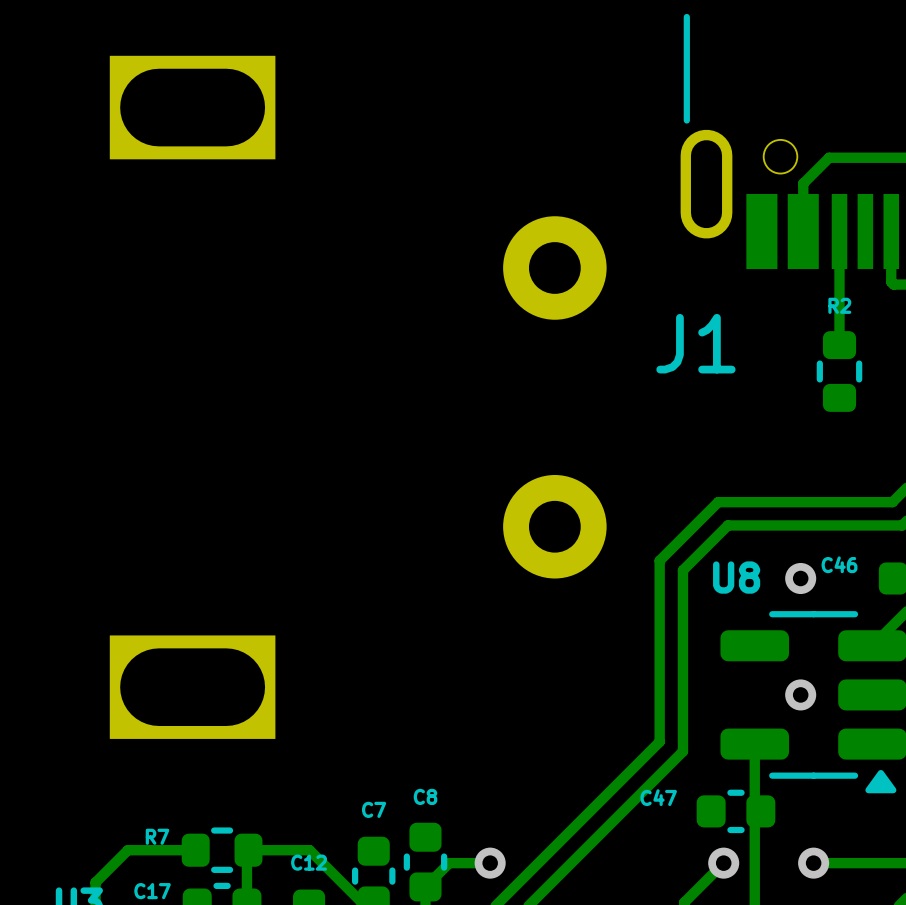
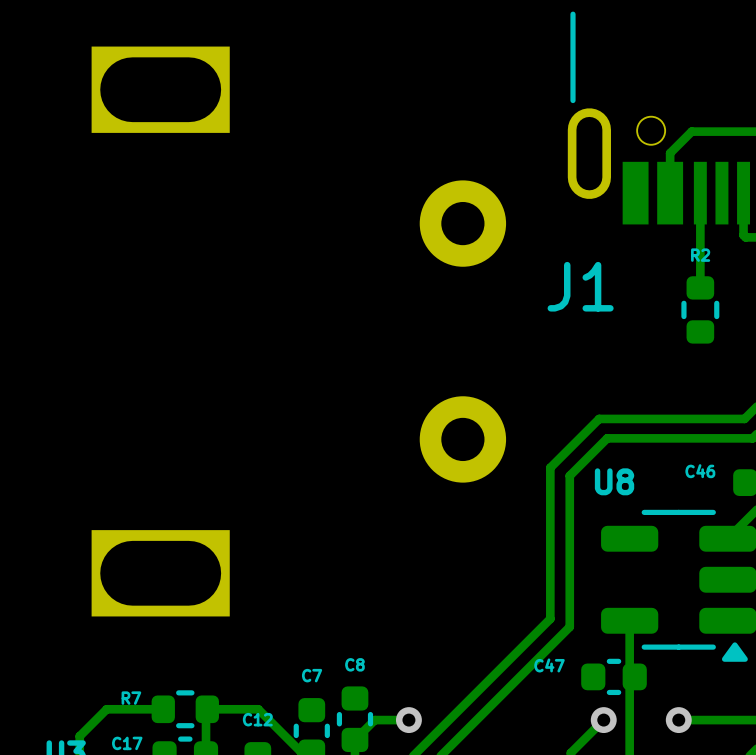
via: (800, 578) -> none
via: (800, 694) -> none

